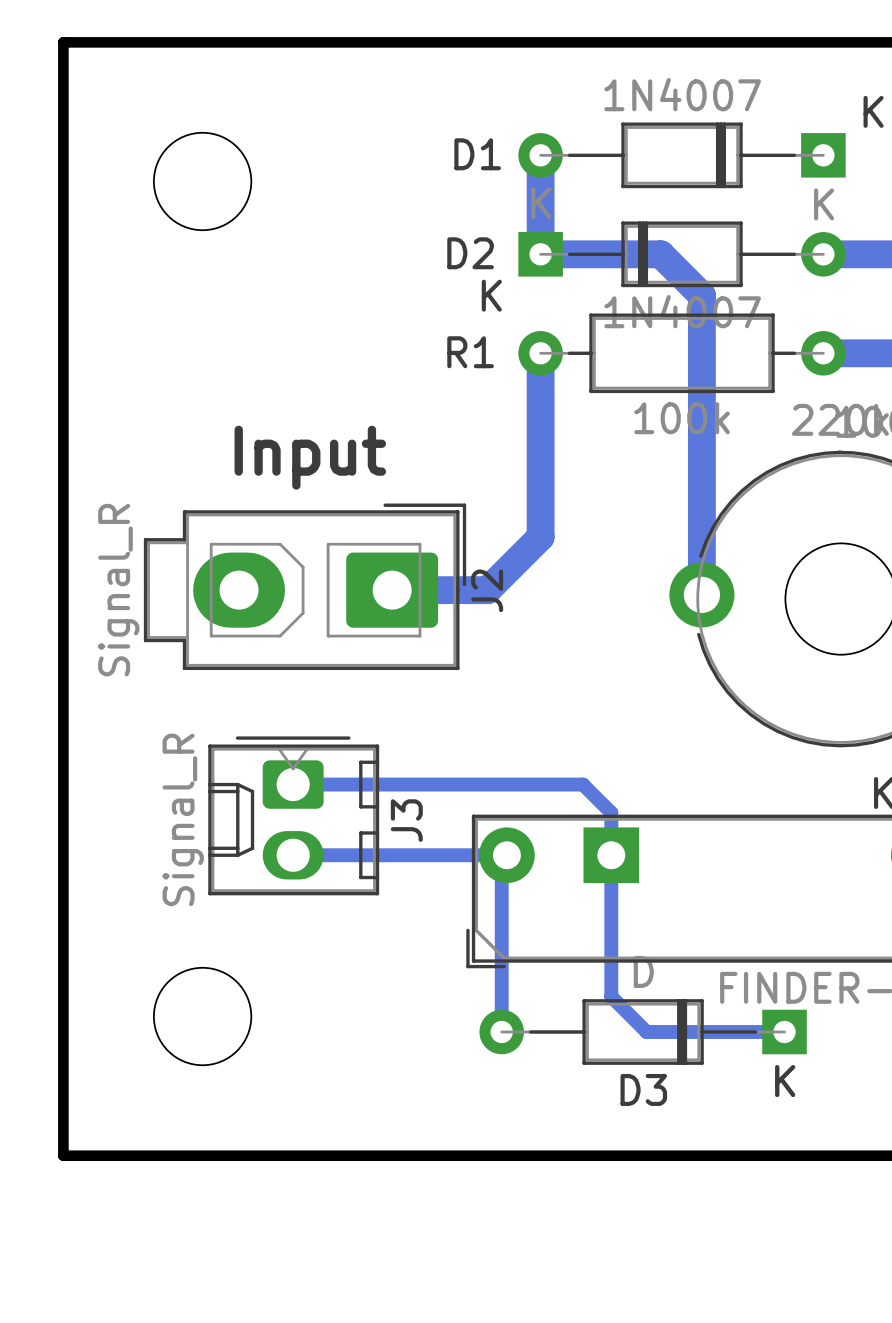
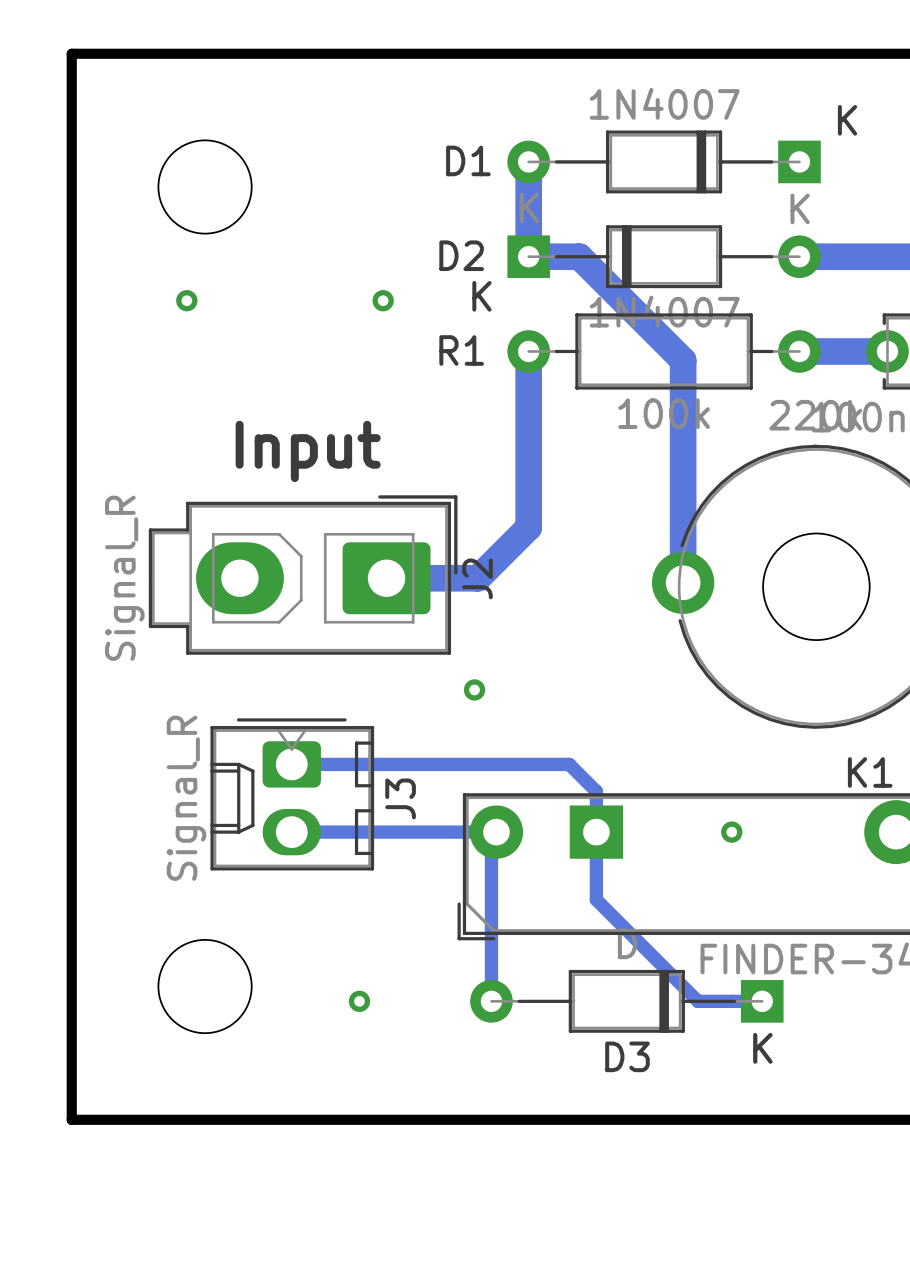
bottom track: (593, 254) (660, 254) (701, 295) (701, 362) -> (579, 256) (683, 360)
via: none -> (186, 300)
via: none -> (383, 300)
via: none -> (474, 689)
via: none -> (731, 832)
bottom track: (611, 925) (611, 996) (646, 1032) (717, 1032) -> (596, 899) (697, 1001)
via: none -> (359, 1001)

